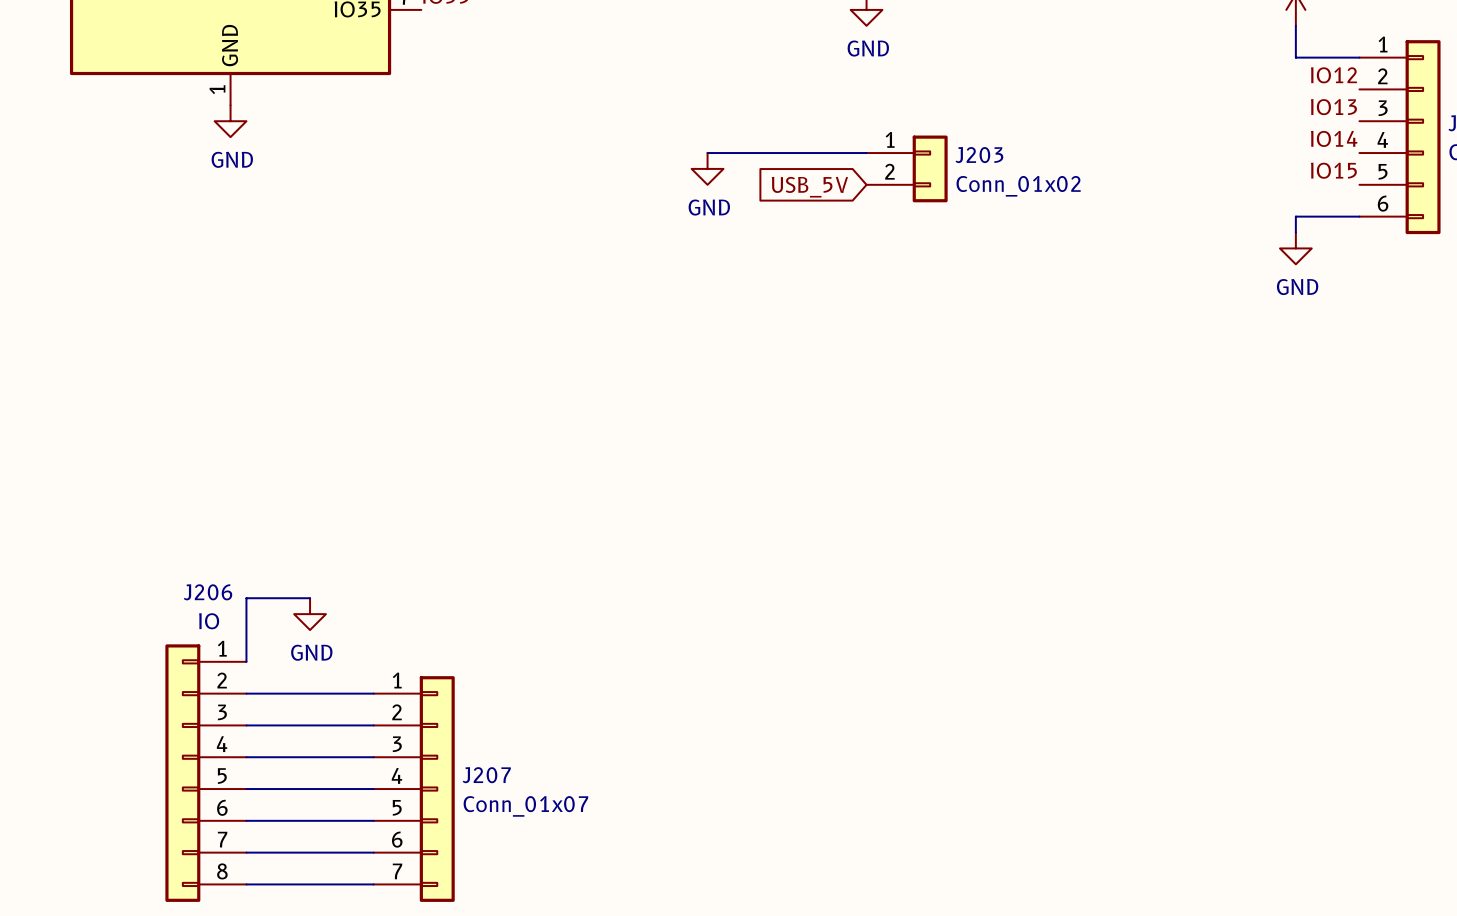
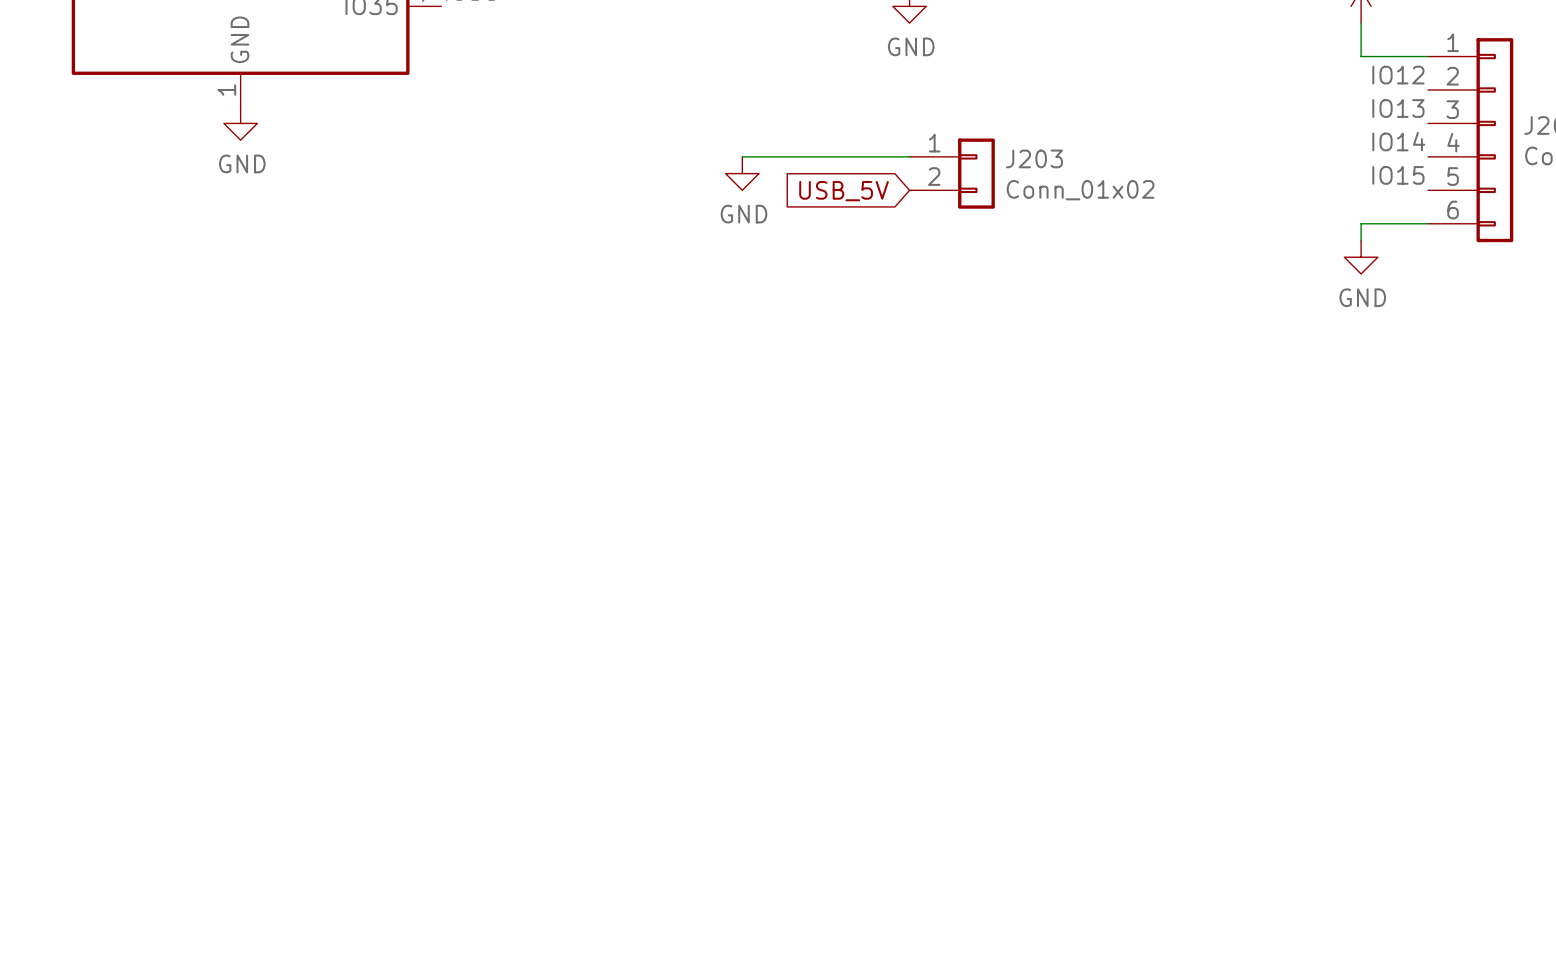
wire: (310, 598) (246, 598) (246, 661) -> none
power symbol: GND (310, 614) -> none
wire: (246, 693) (373, 693) -> none
wire: (246, 725) (373, 725) -> none
wire: (246, 757) (373, 757) -> none
J206: IO (205, 773) -> none
wire: (246, 789) (373, 789) -> none
J207: Conn_01x07 (414, 789) -> none
wire: (246, 820) (373, 820) -> none
wire: (246, 852) (373, 852) -> none
wire: (246, 884) (373, 884) -> none

